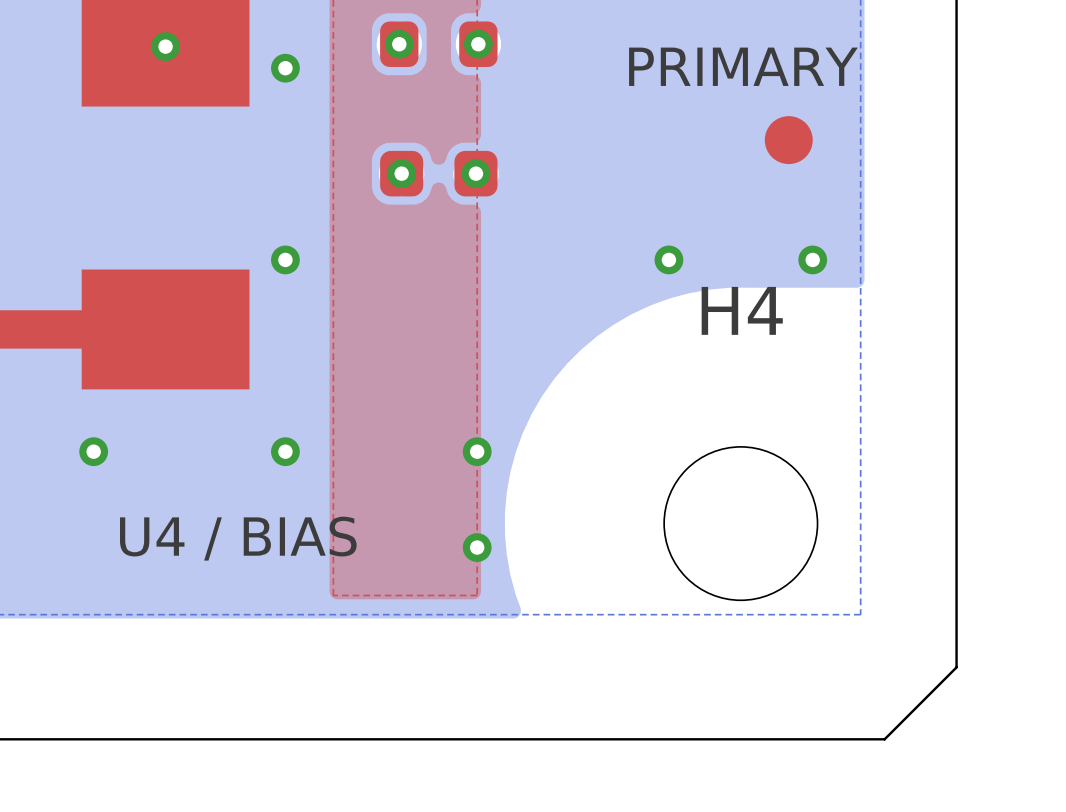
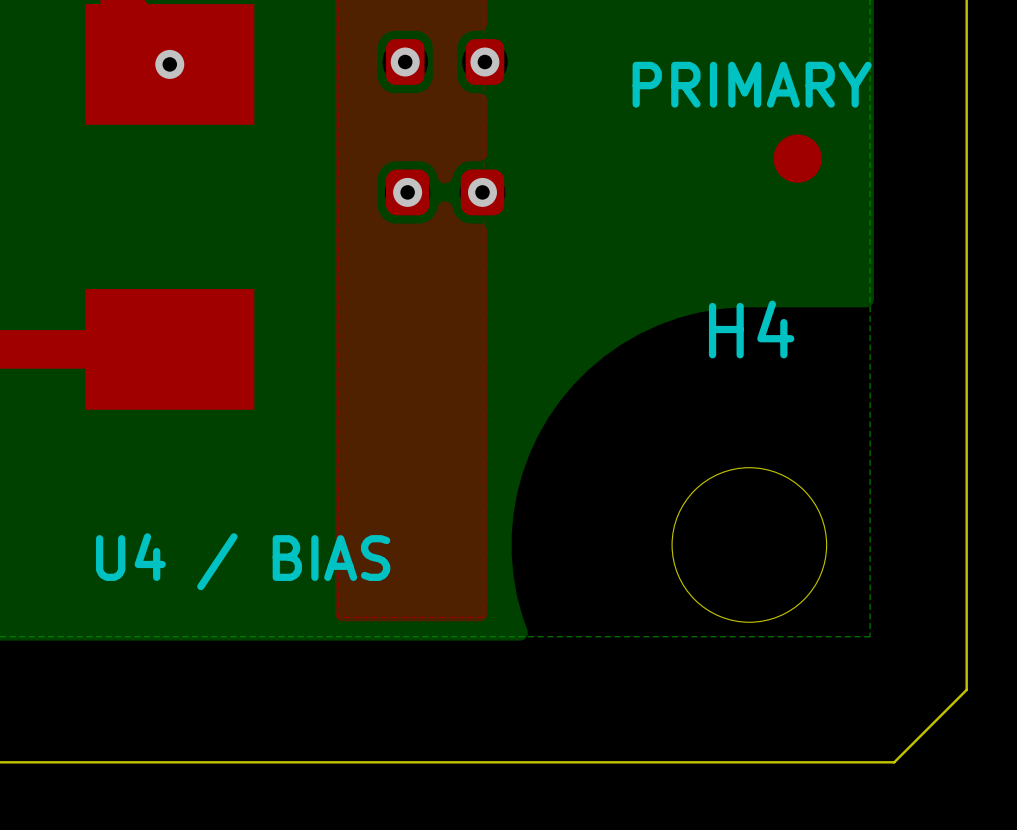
via: (285, 68) -> none
via: (285, 259) -> none
via: (668, 259) -> none
via: (812, 259) -> none
via: (93, 451) -> none
via: (285, 451) -> none
via: (477, 451) -> none
via: (477, 547) -> none

